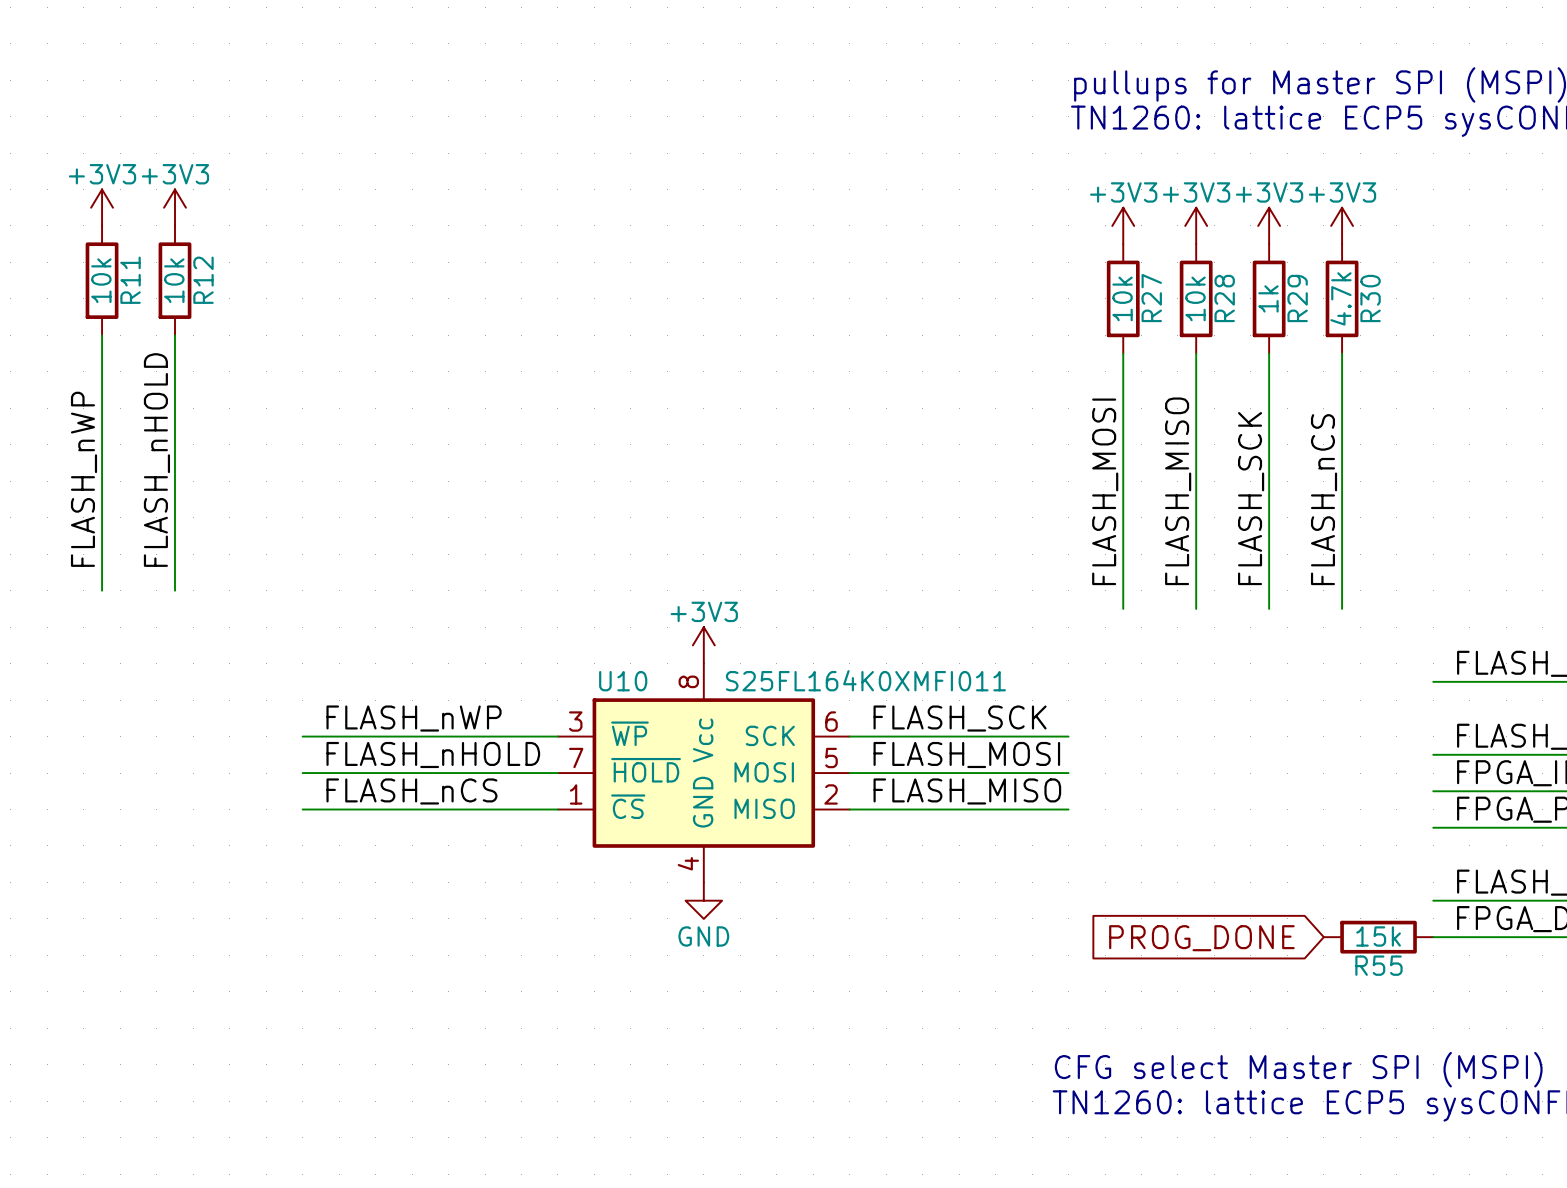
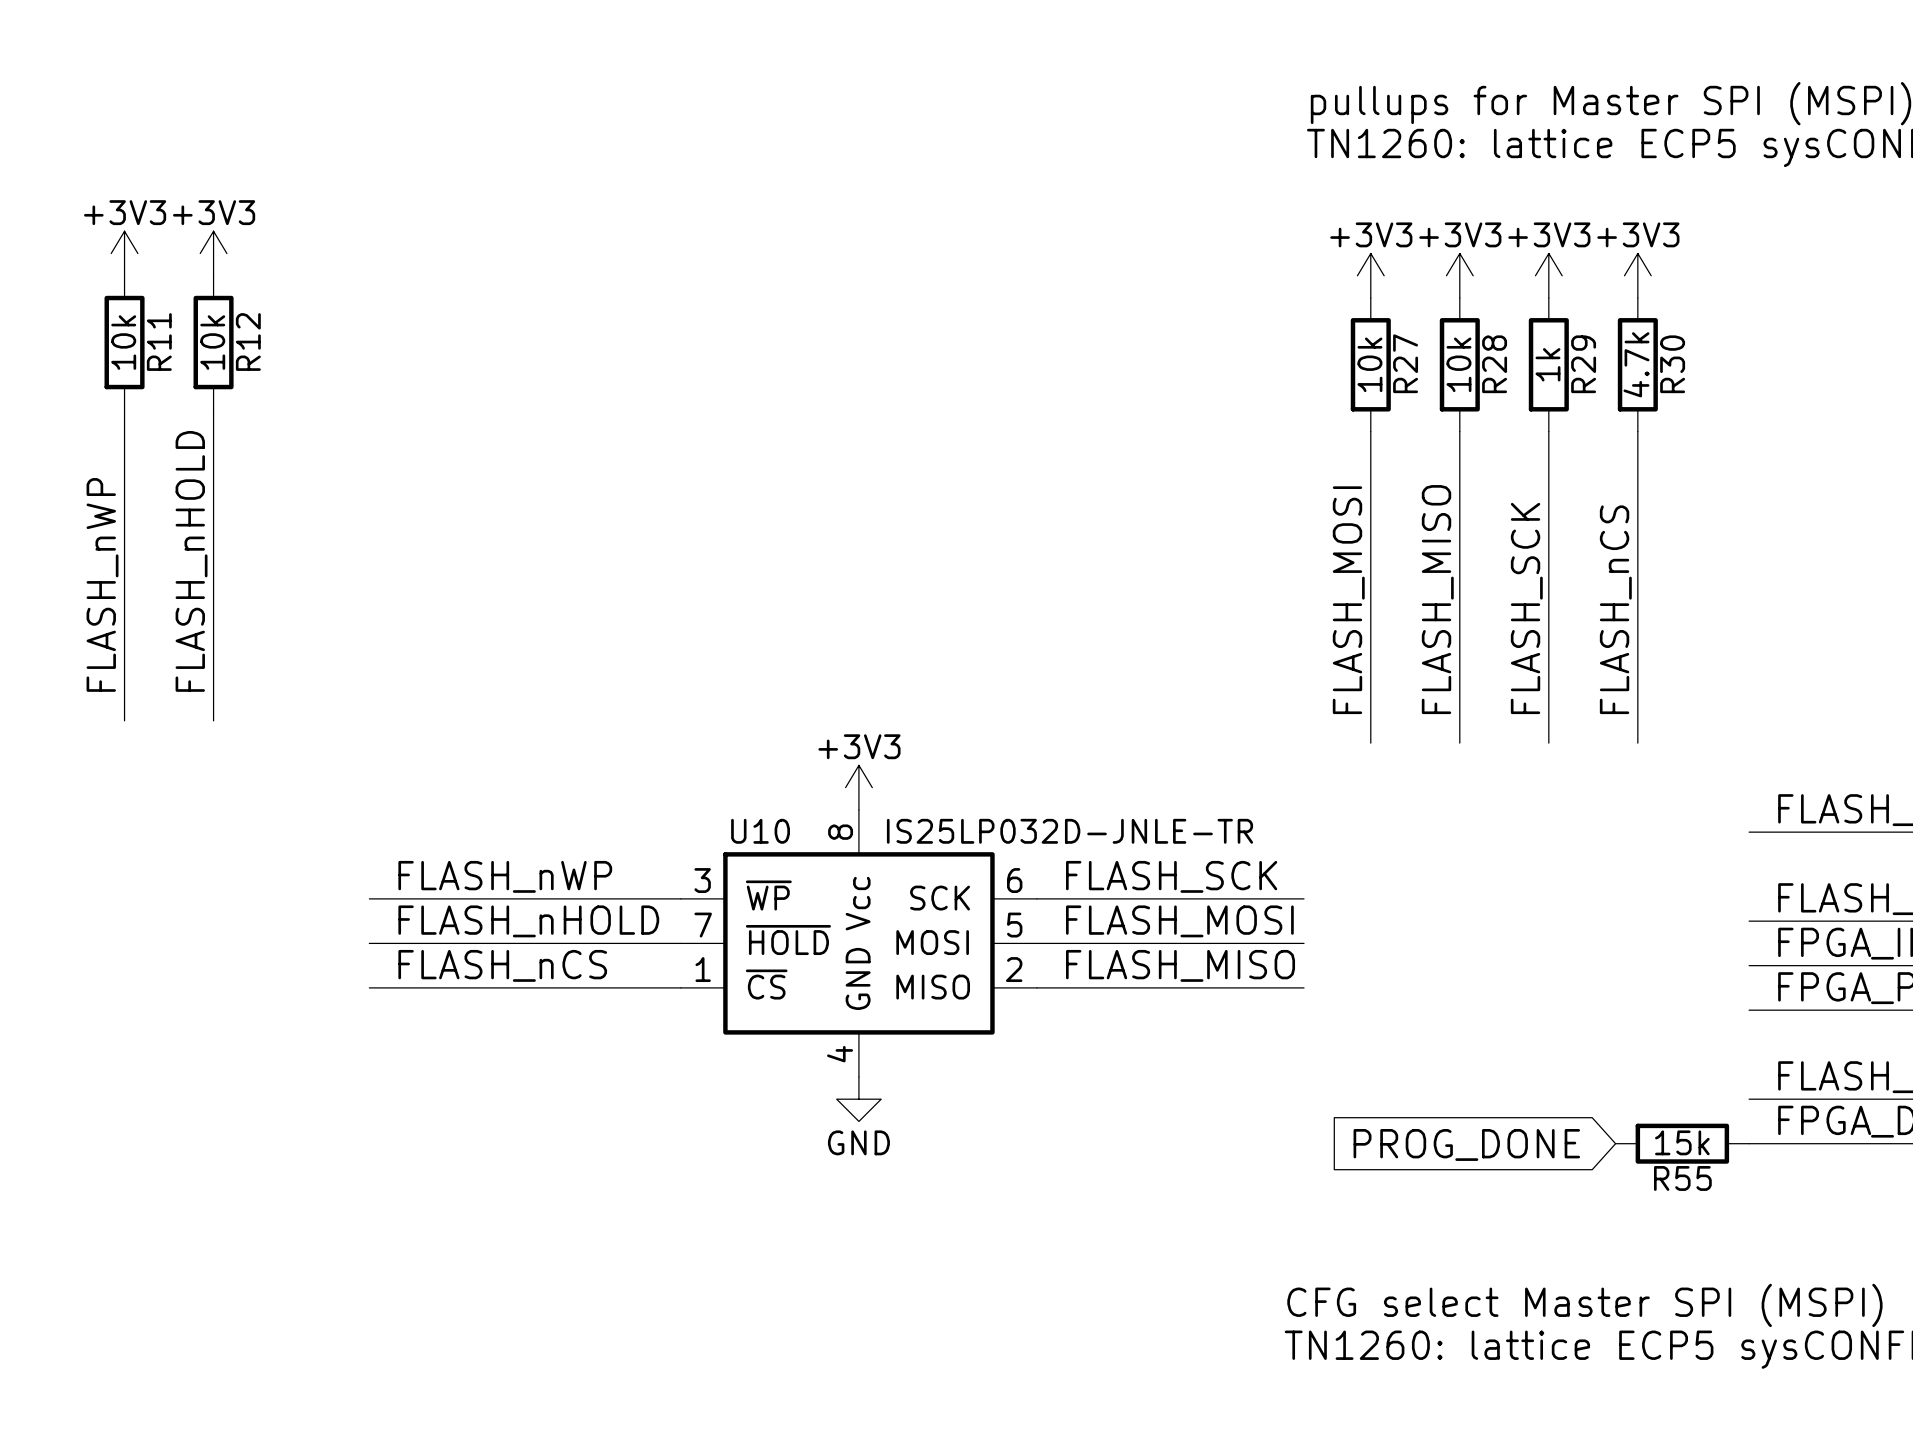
U10 value: S25FL164K0XMFI011 (865, 680) -> IS25LP032D-JNLE-TR (1069, 831)

